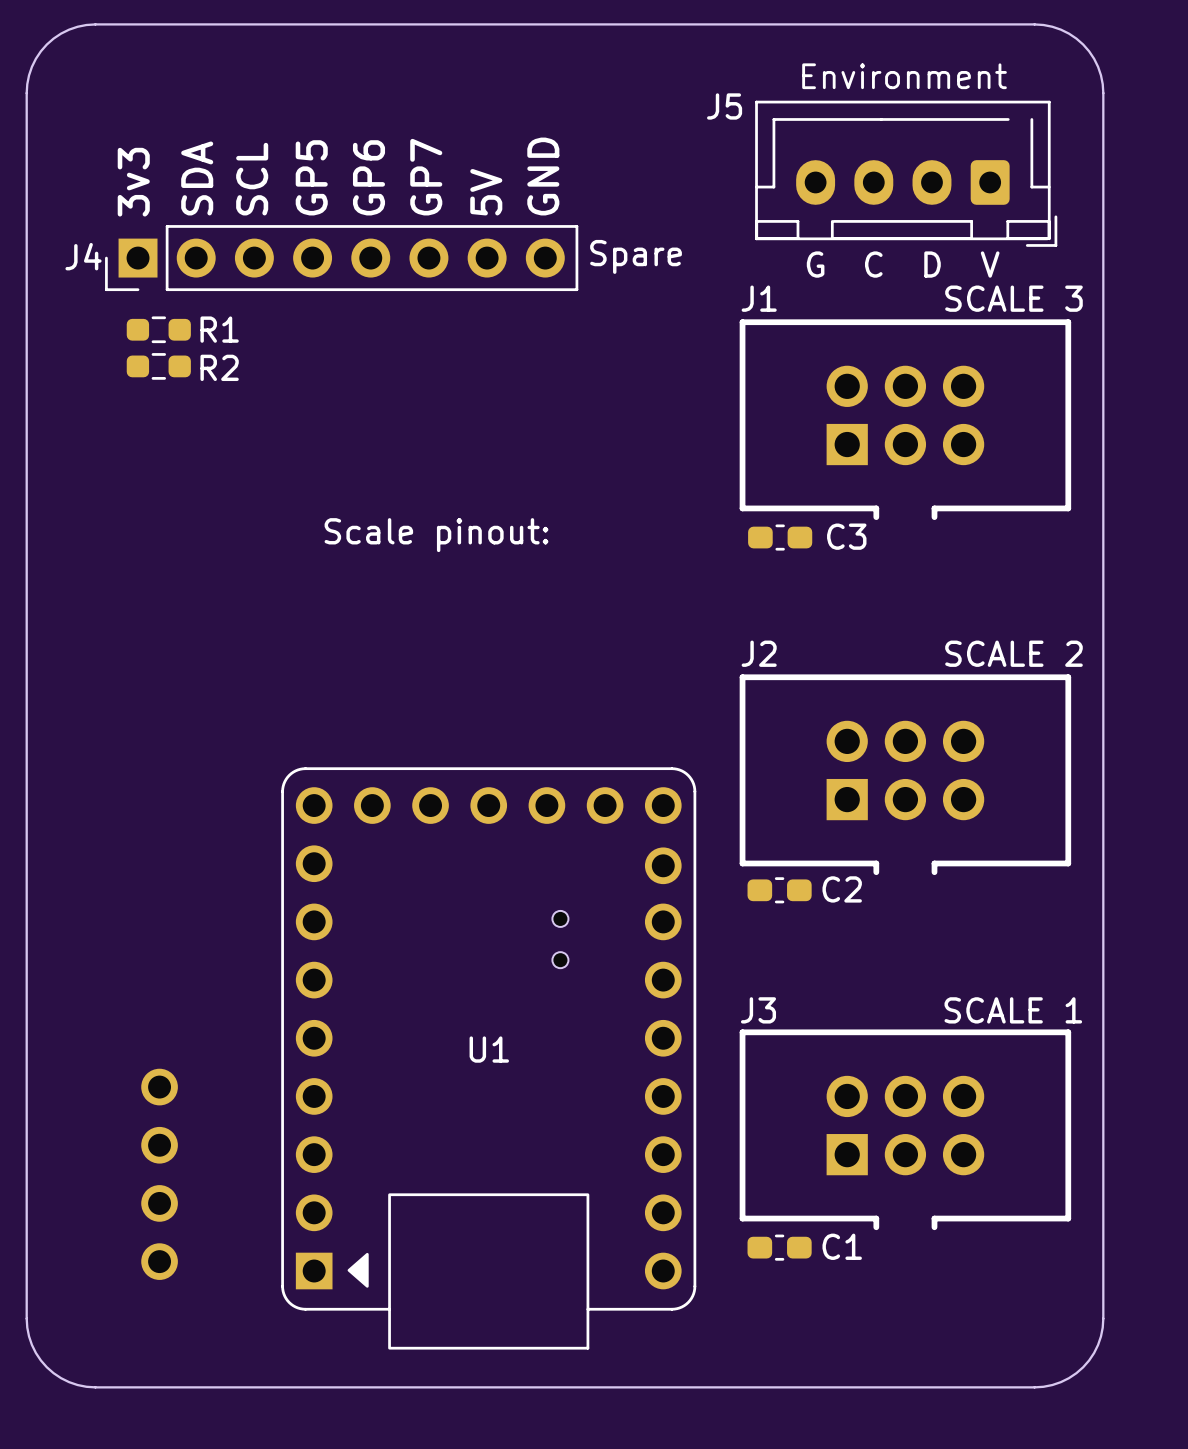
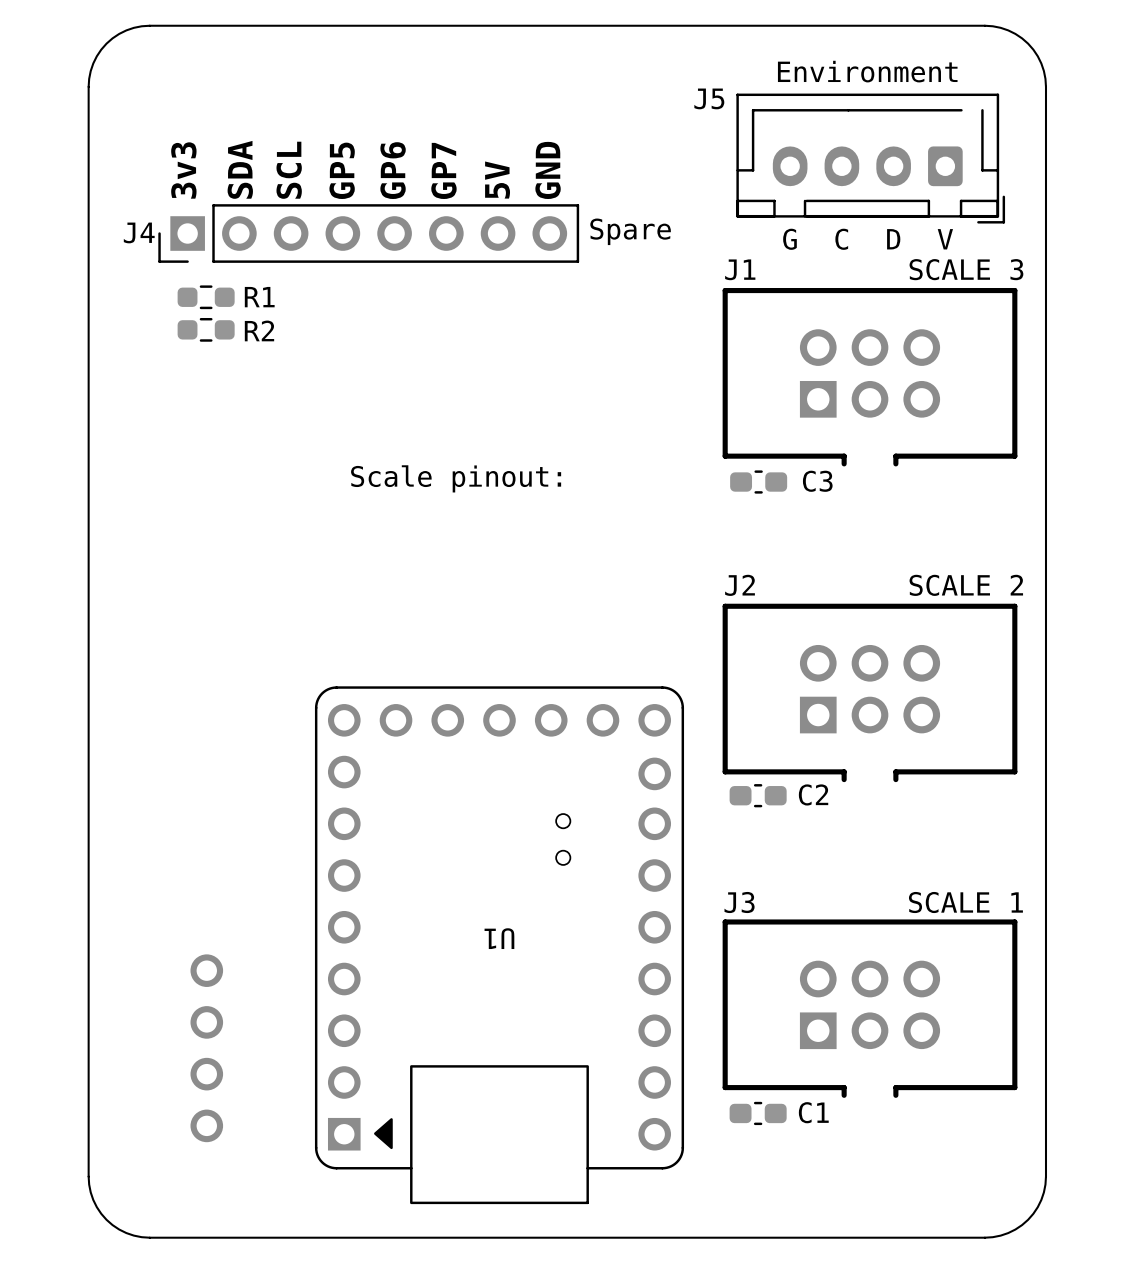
U1 name rotation: 0° (489, 1049) -> 180° (499, 938)

